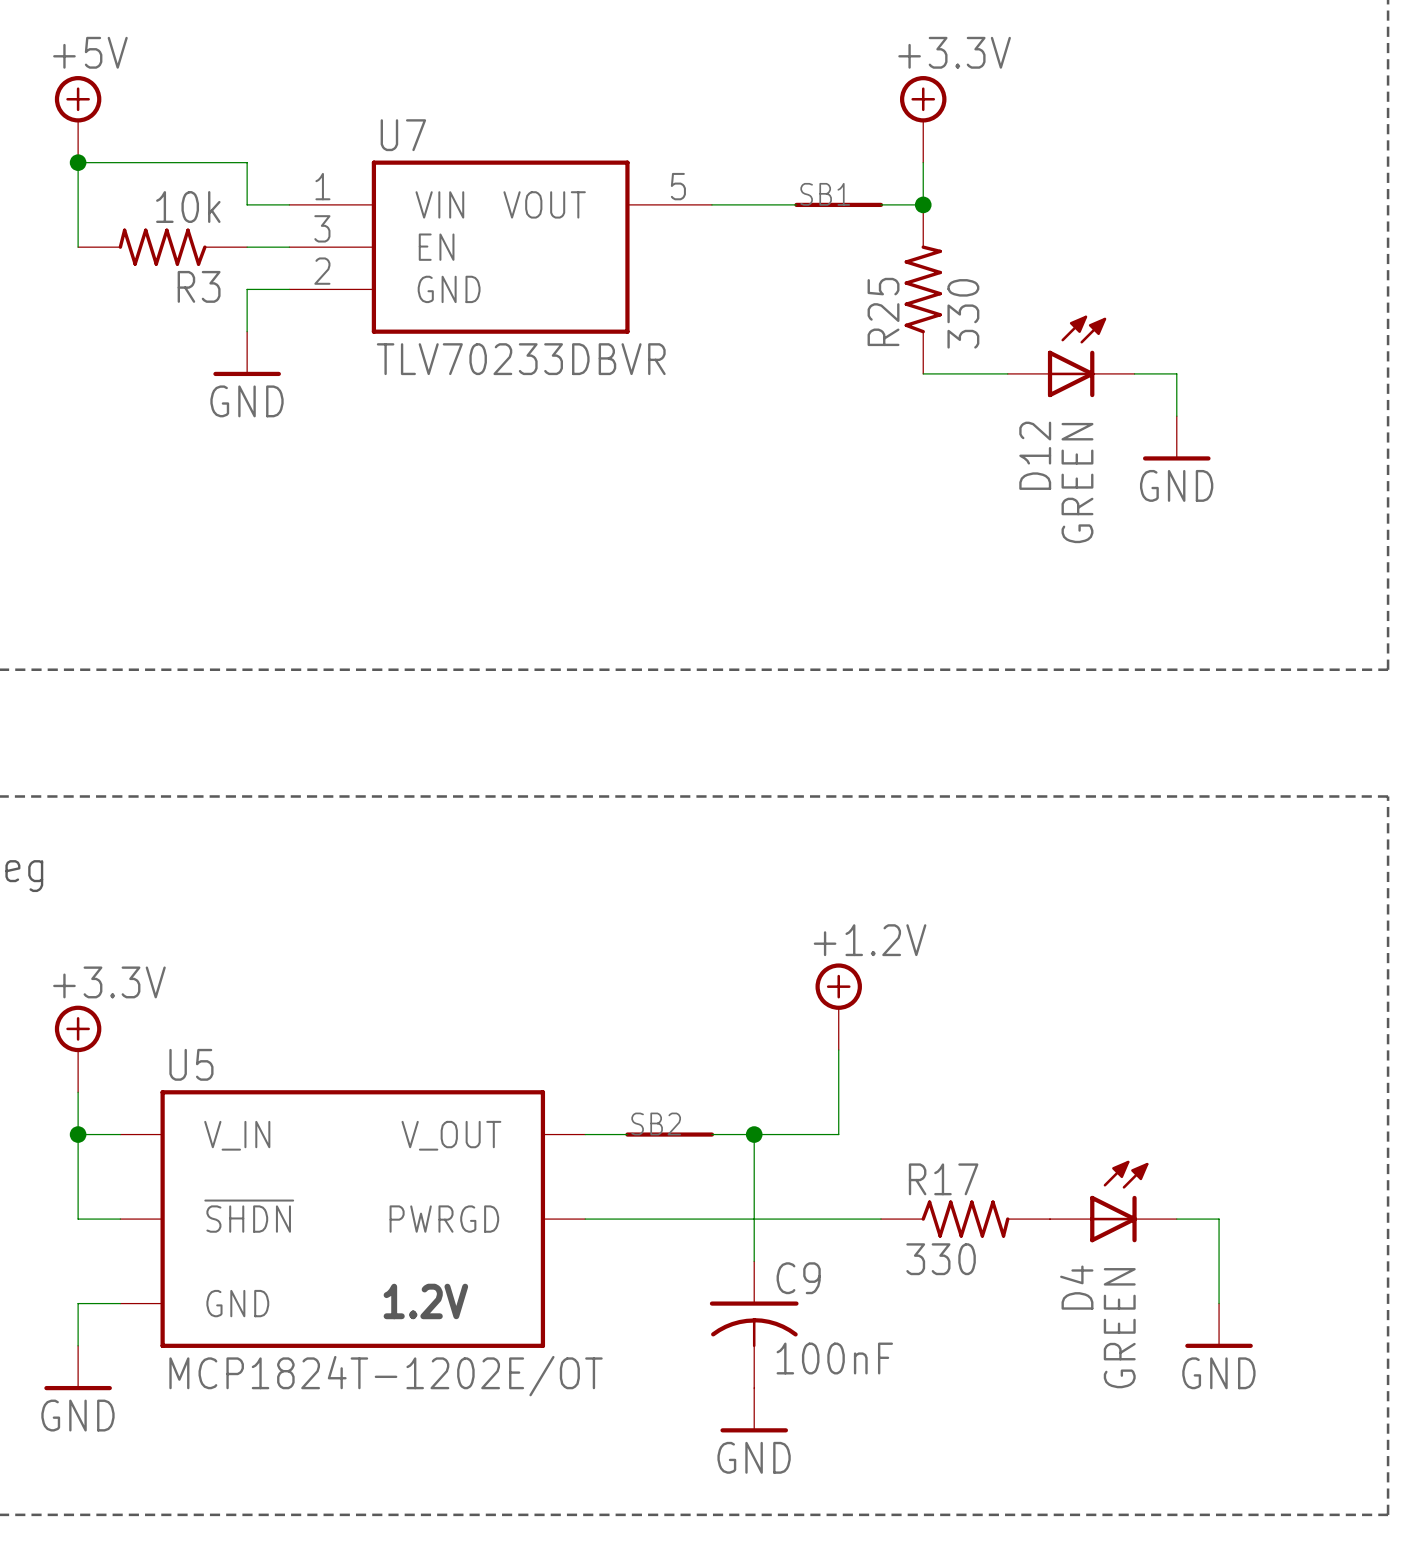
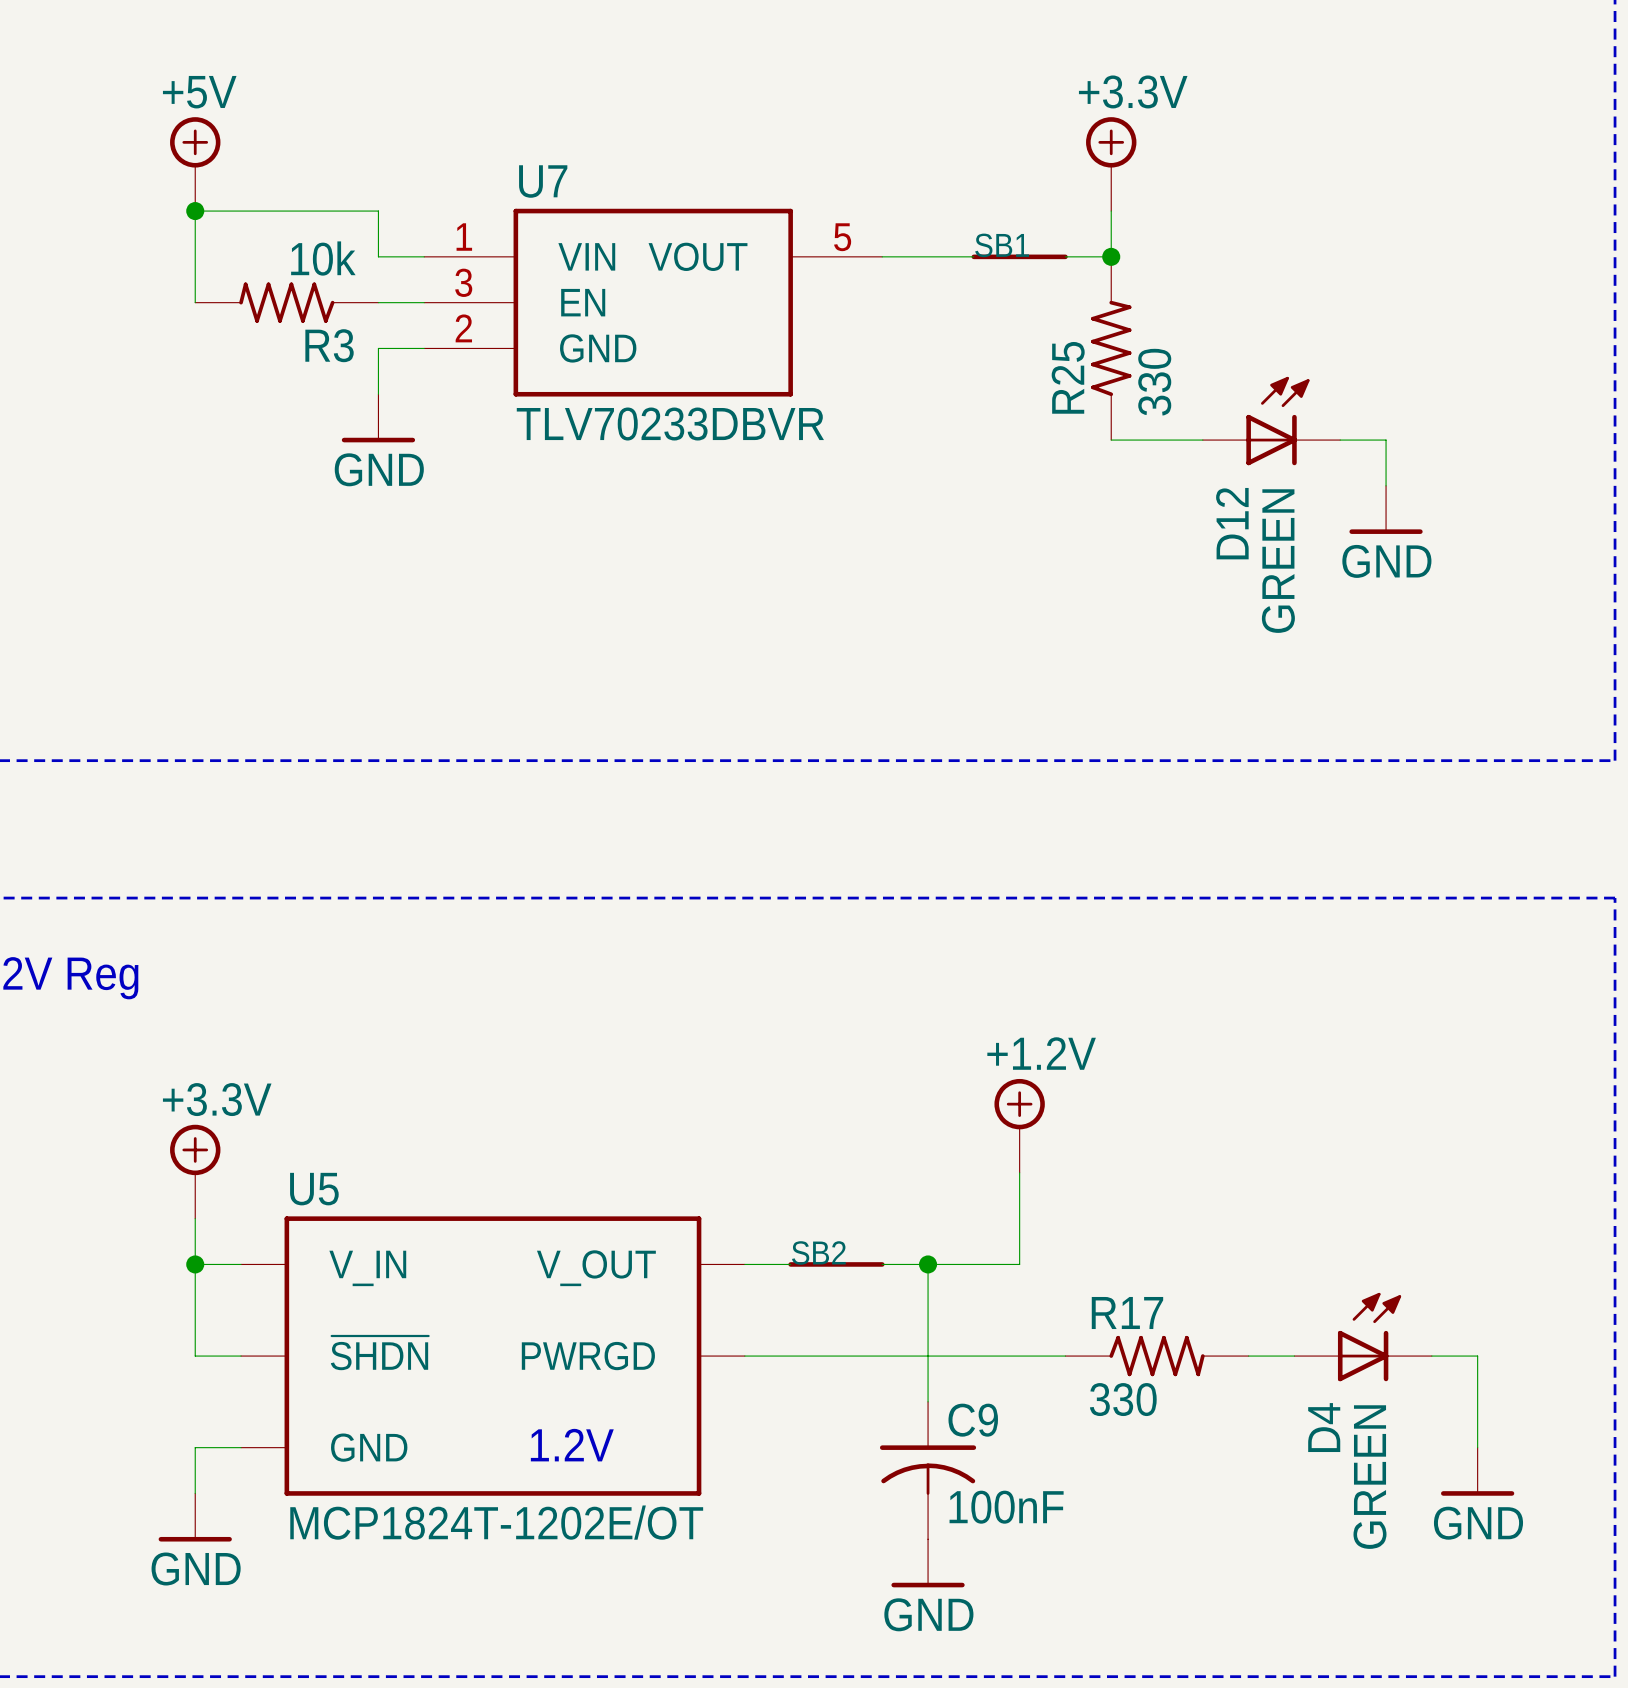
D4 position: (1113, 1201) -> (1363, 1337)
wire: (1176, 1219) (1219, 1219) (1219, 1303) -> (1431, 1356) (1477, 1356) (1477, 1447)
power symbol position: GND (1219, 1325) -> GND (1477, 1471)

